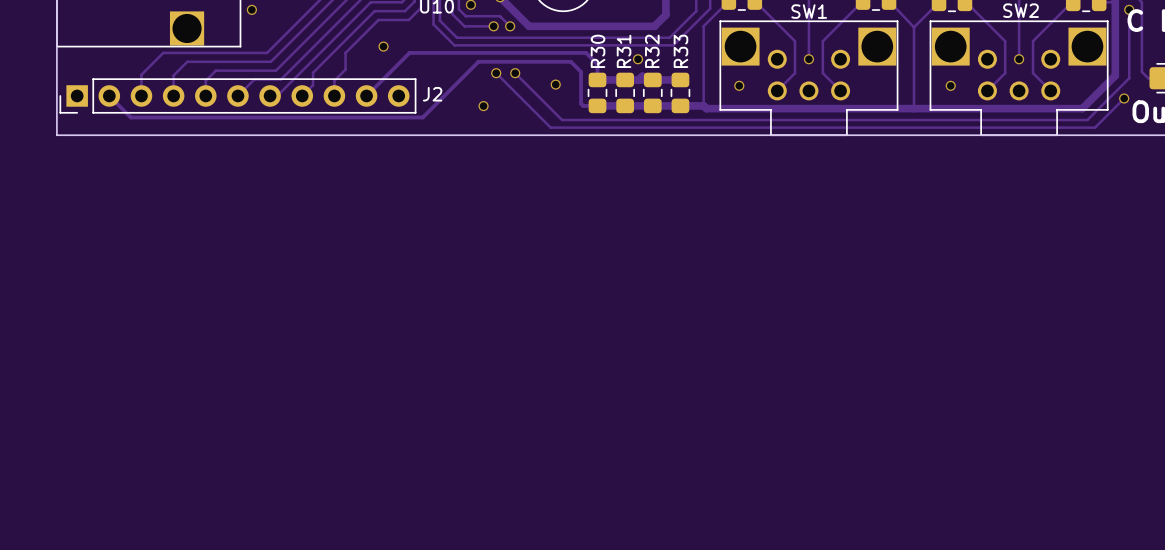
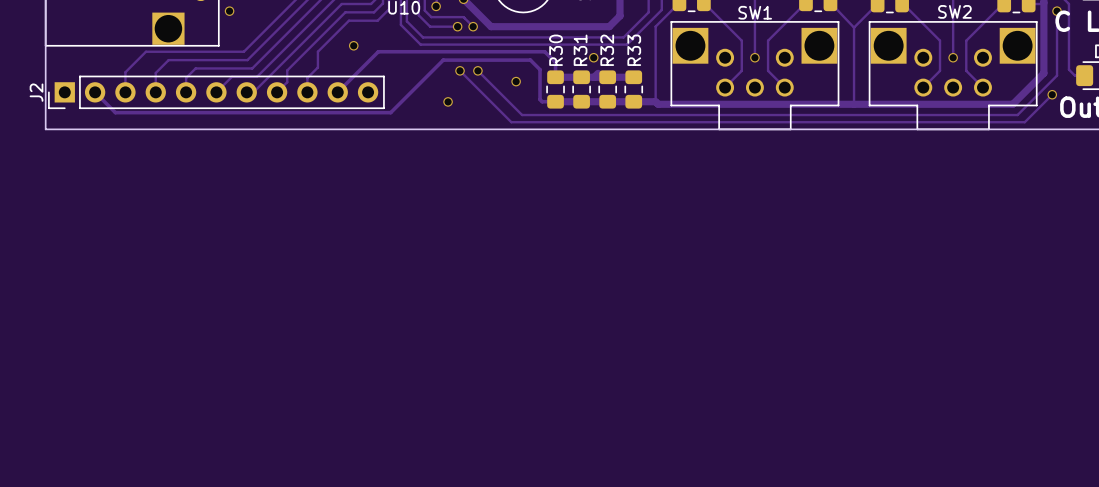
via: (739, 85) -> none
via: (950, 85) -> none
J2 name rotation: 0° (432, 94) -> 90° counterclockwise (36, 92)
J2 name position: J2 (432, 94) -> J2 (36, 92)

